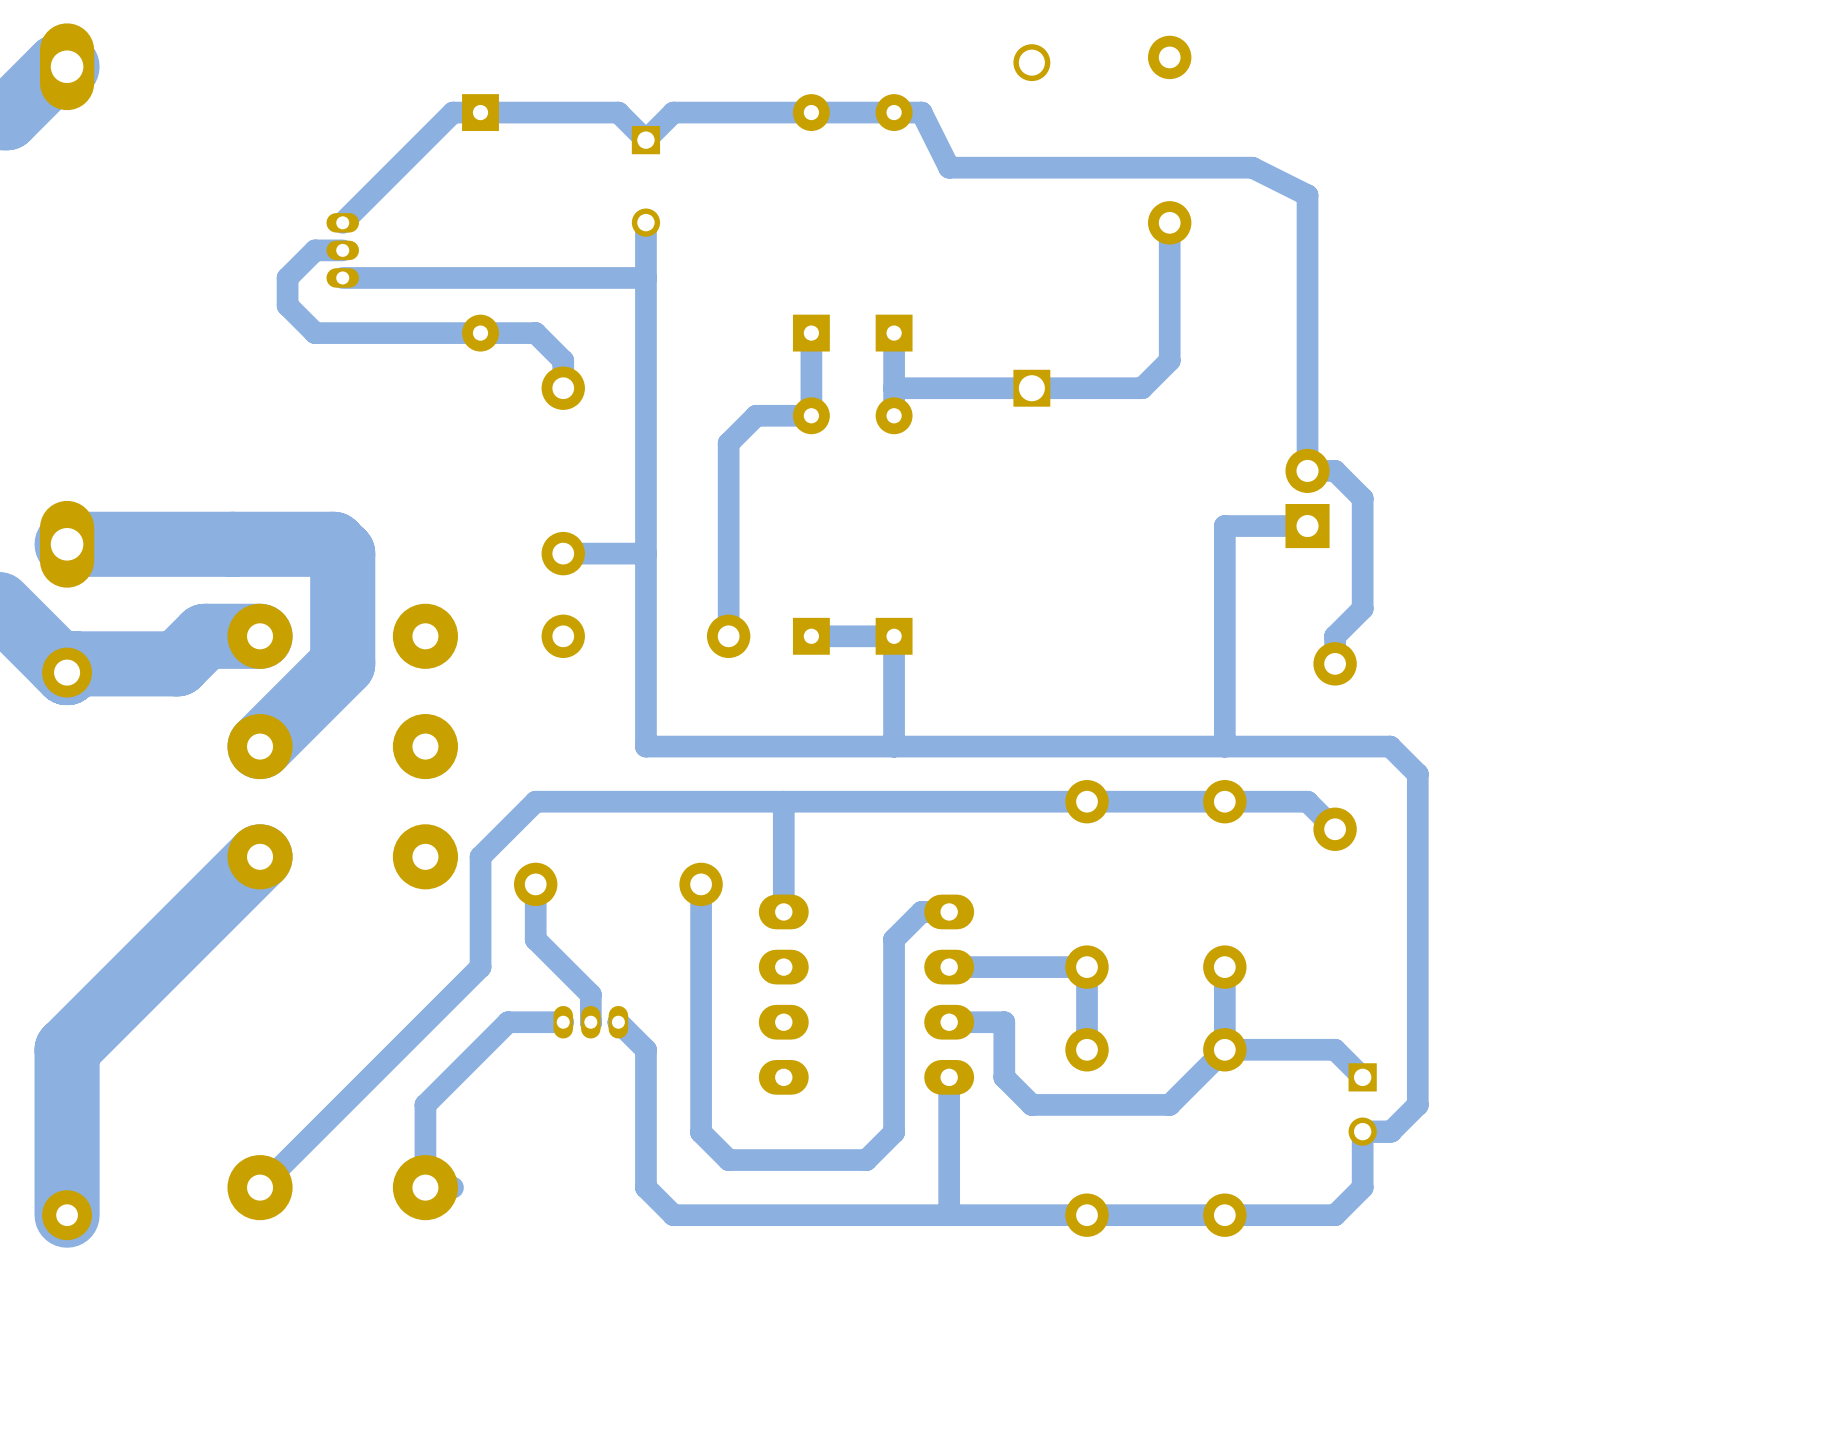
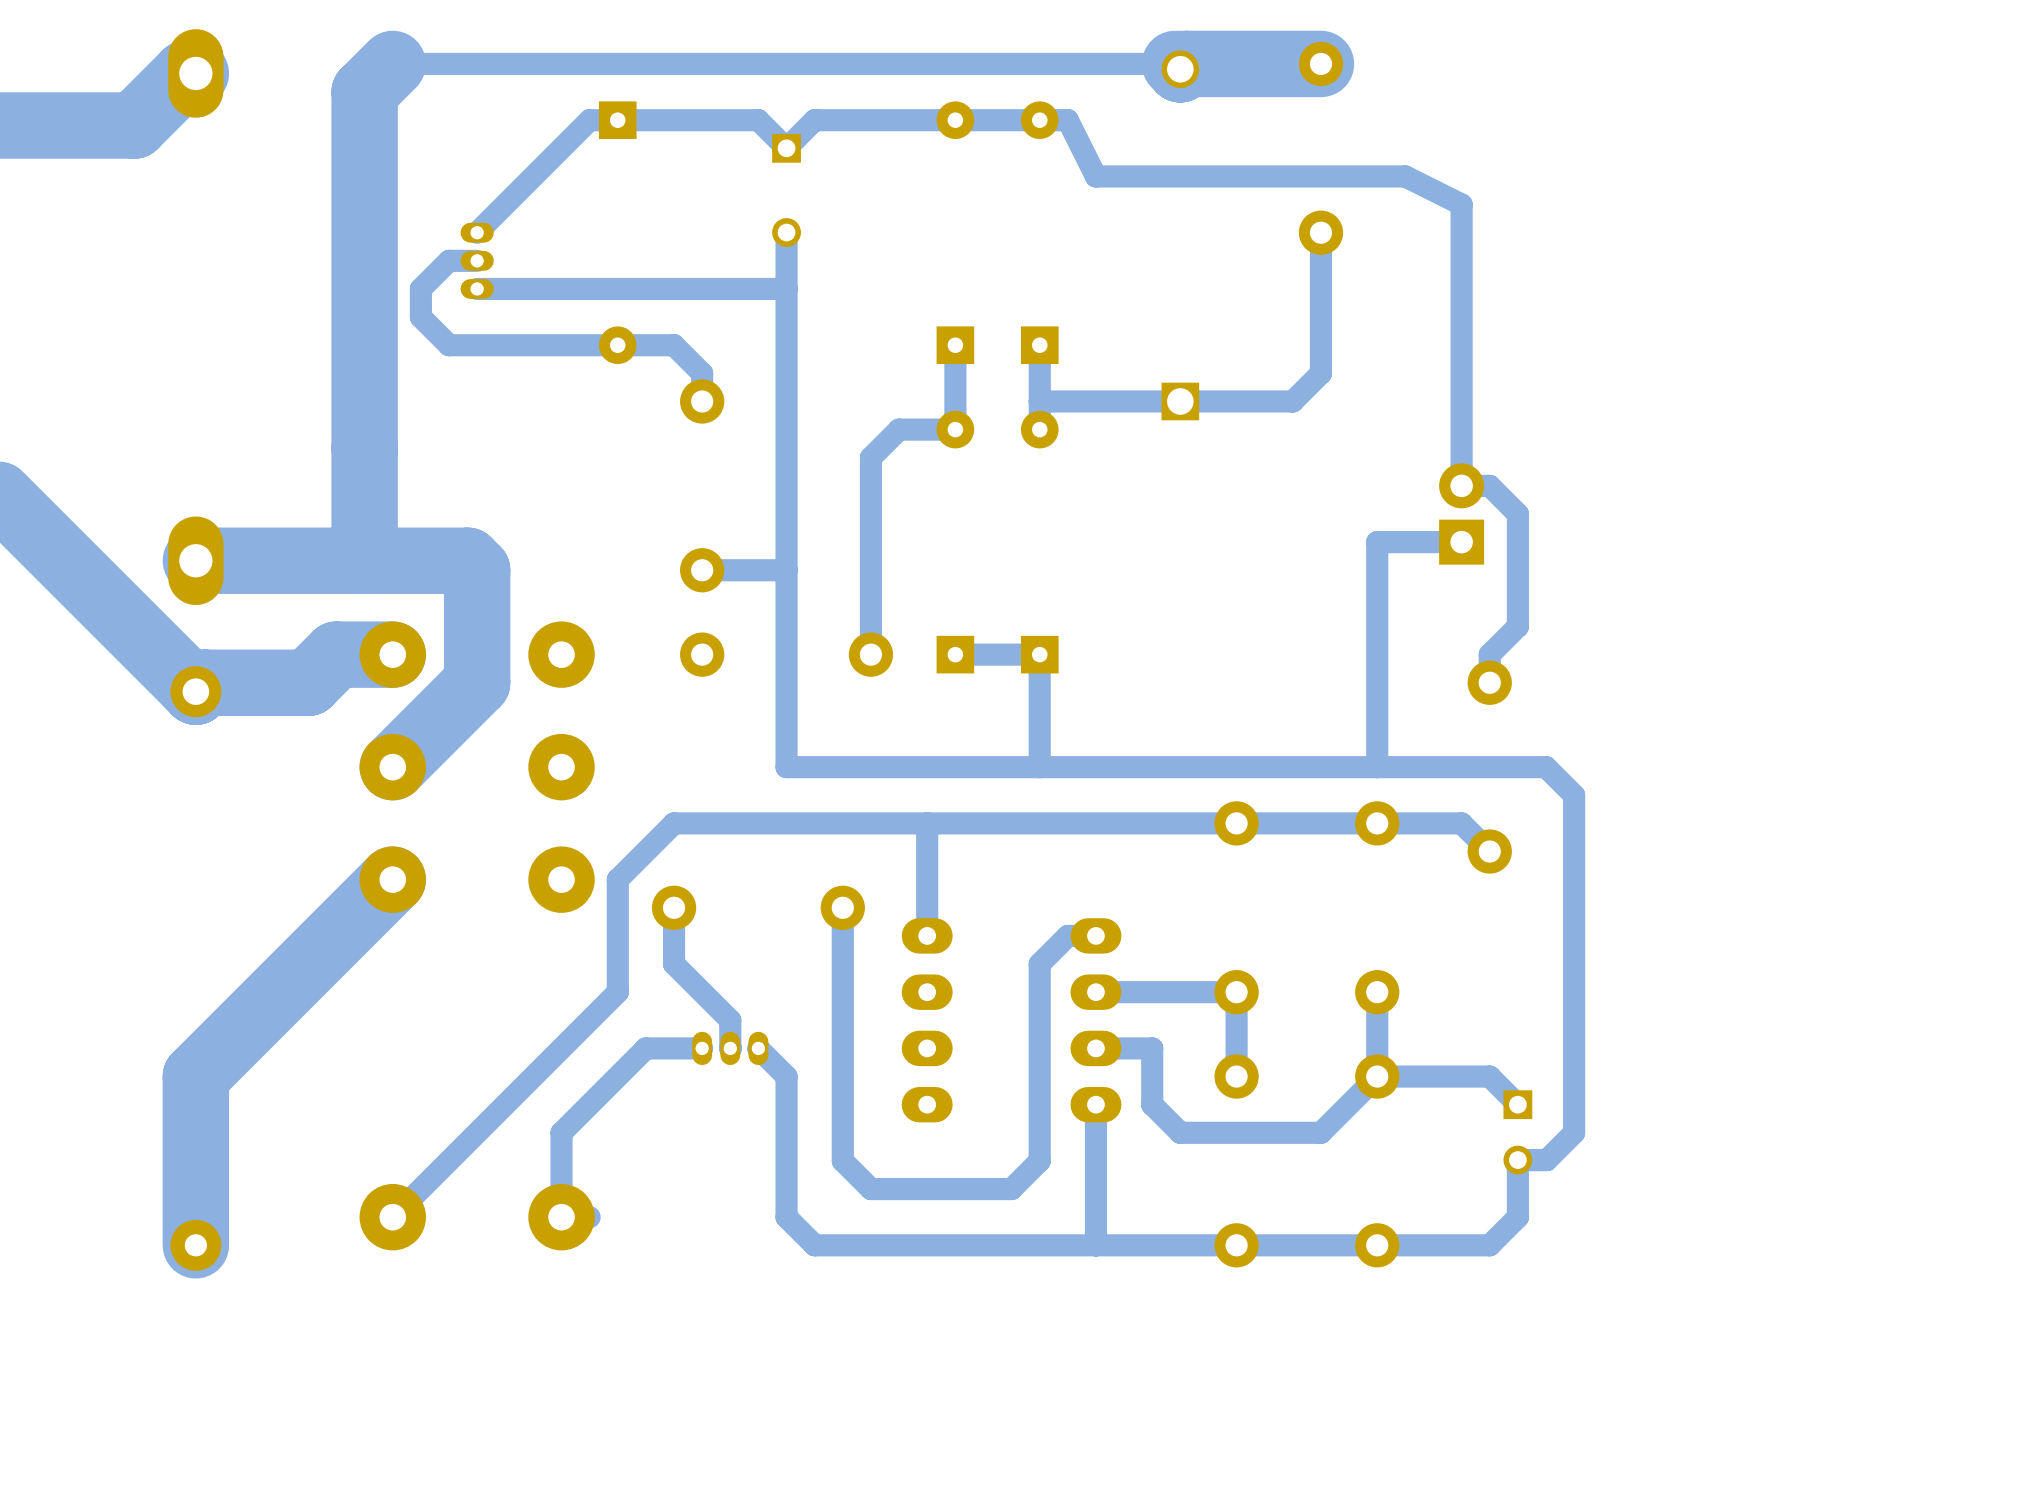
track: none -> (1320, 63) (1185, 63) (1180, 69)
track: none -> (1180, 69) (1175, 63) (392, 63) (364, 92) (364, 560)

